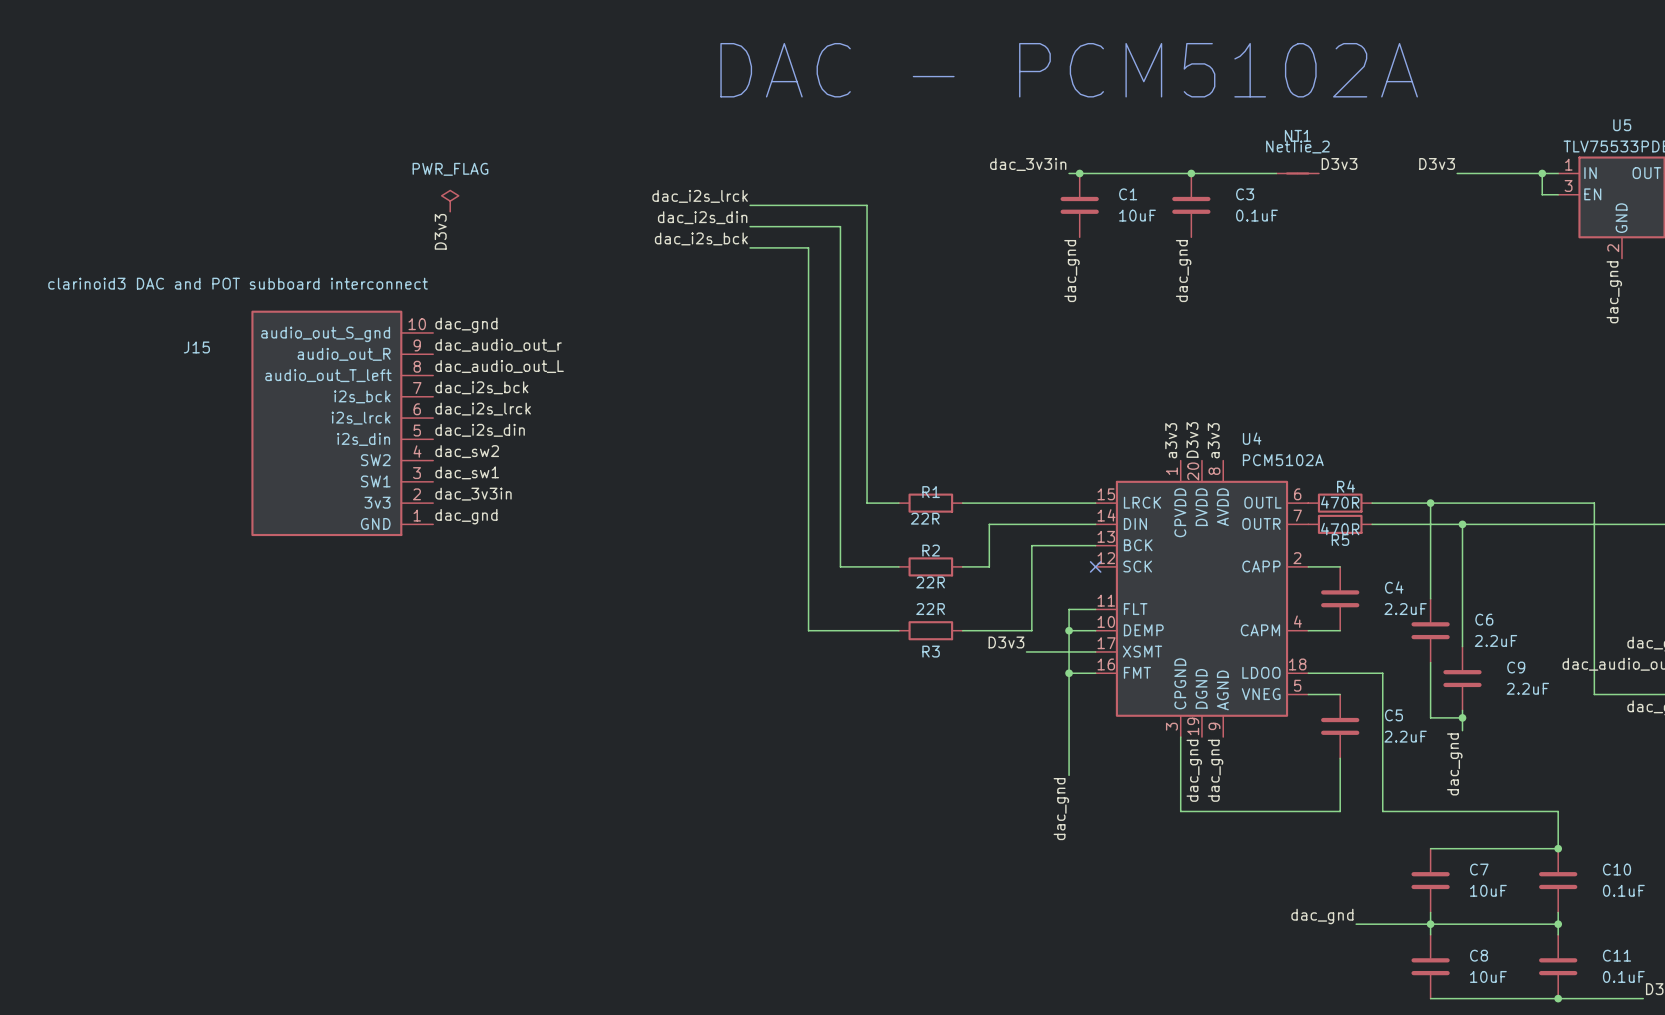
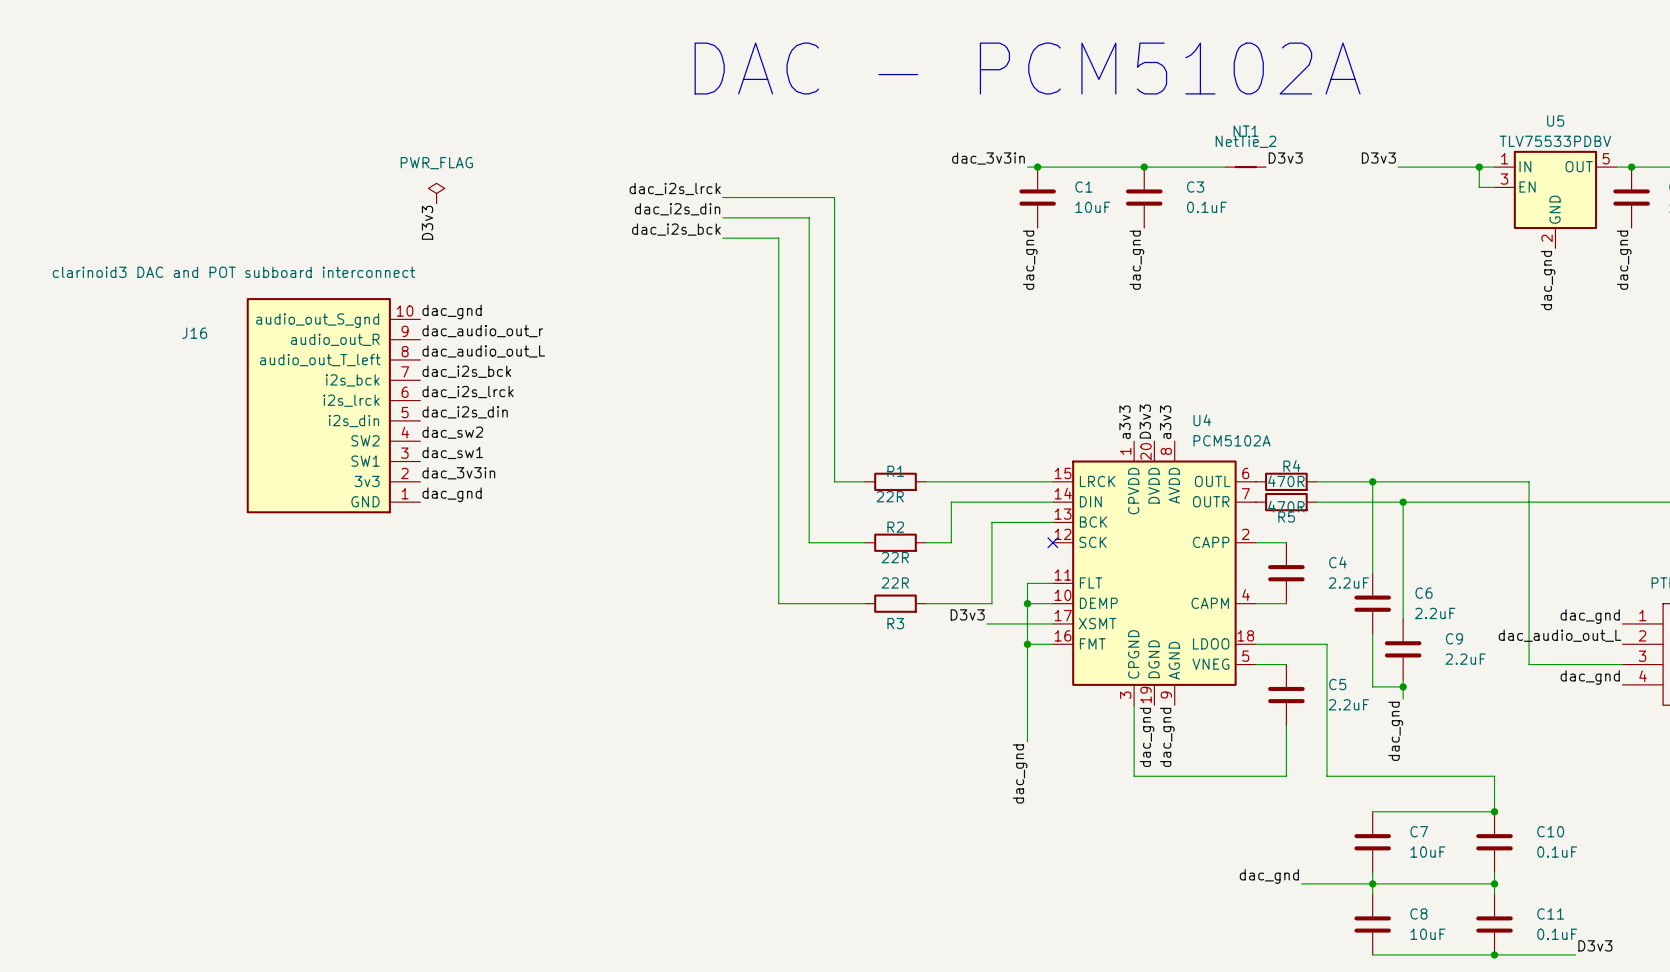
J15 name: J15 (196, 347) -> J16 (194, 333)

